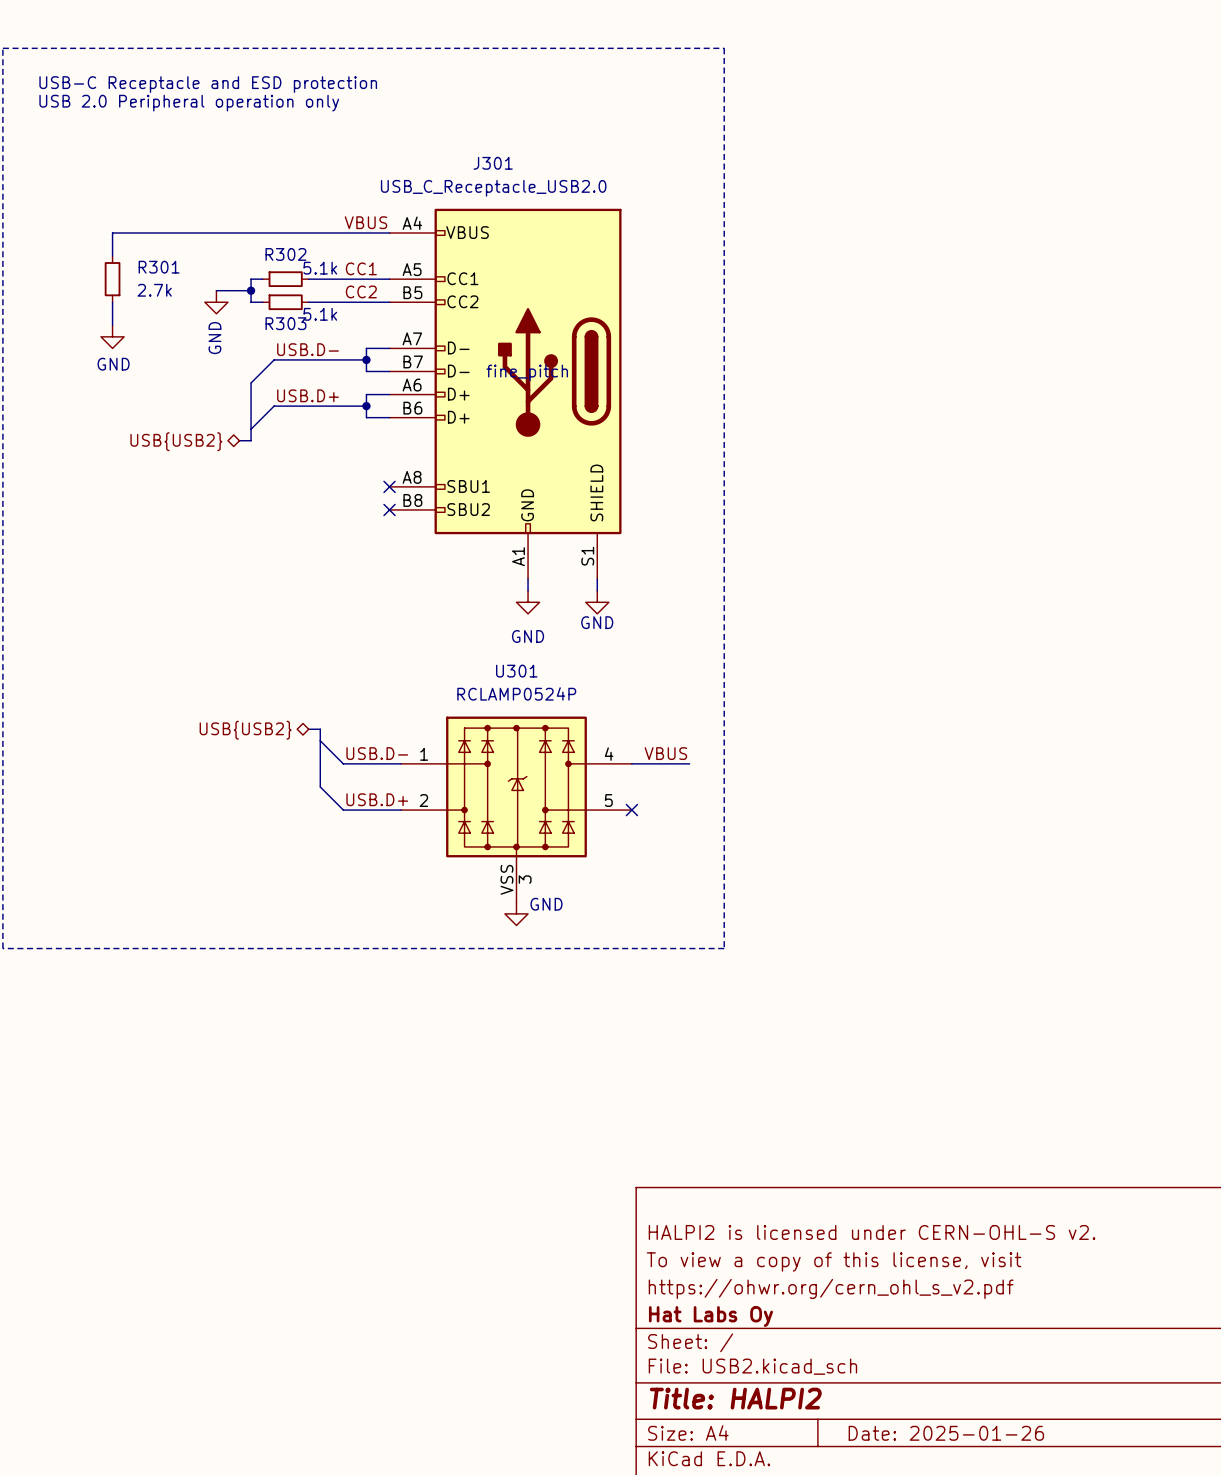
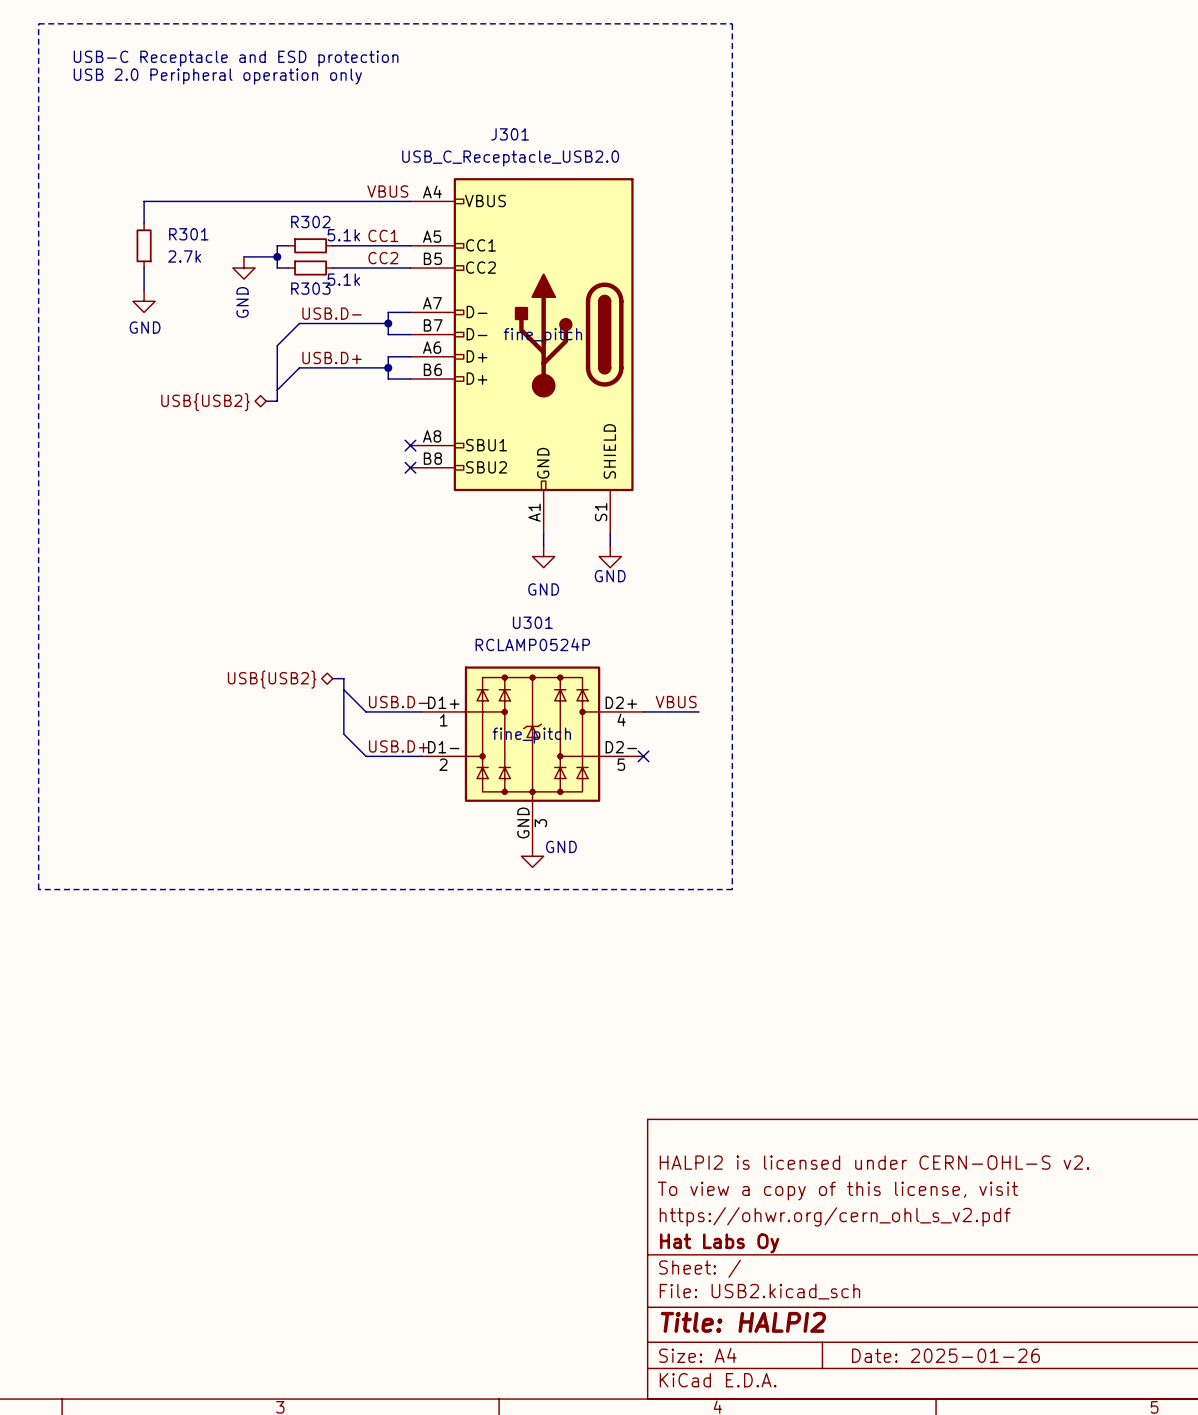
U301 symbol: [401, 716, 632, 903] -> [421, 666, 644, 846]
U301 text: none -> fine_pitch (531, 735)

